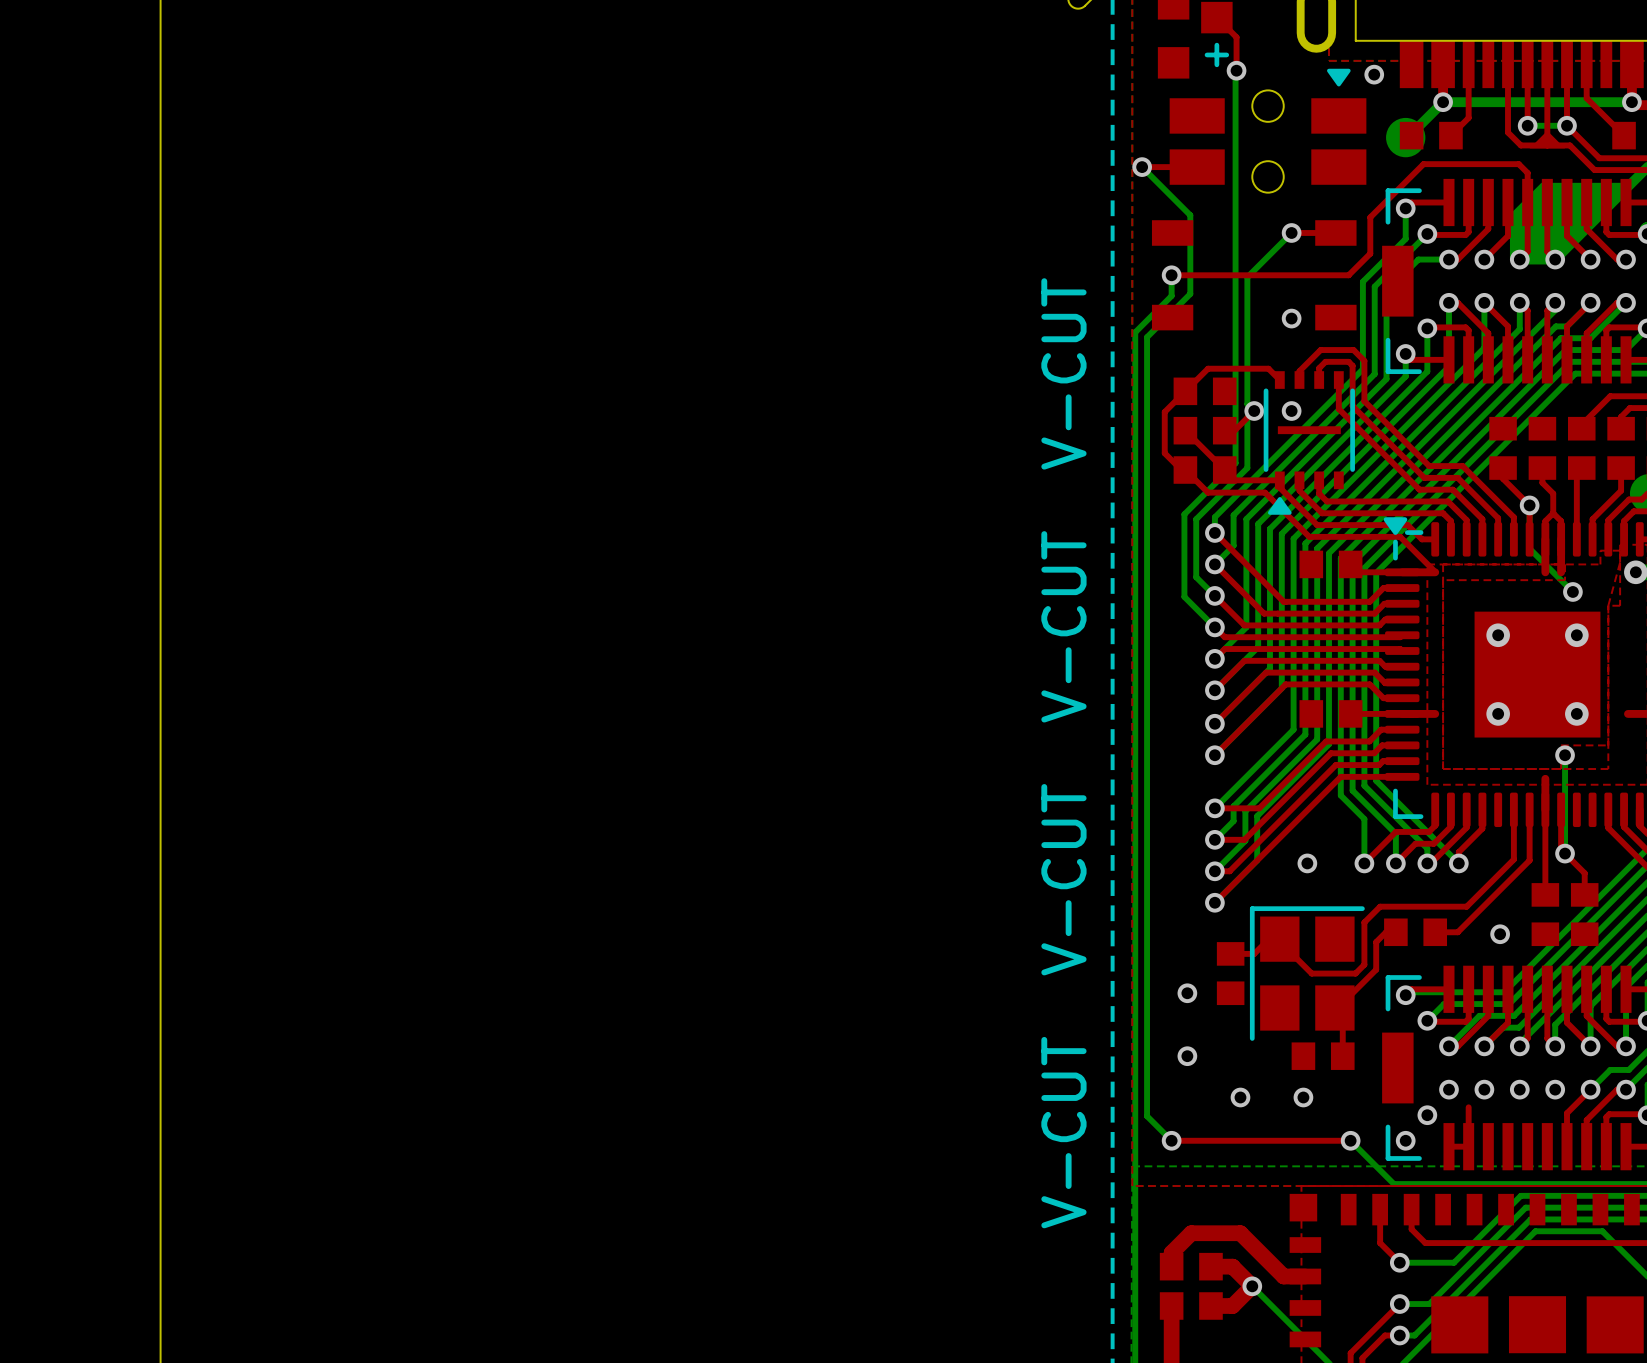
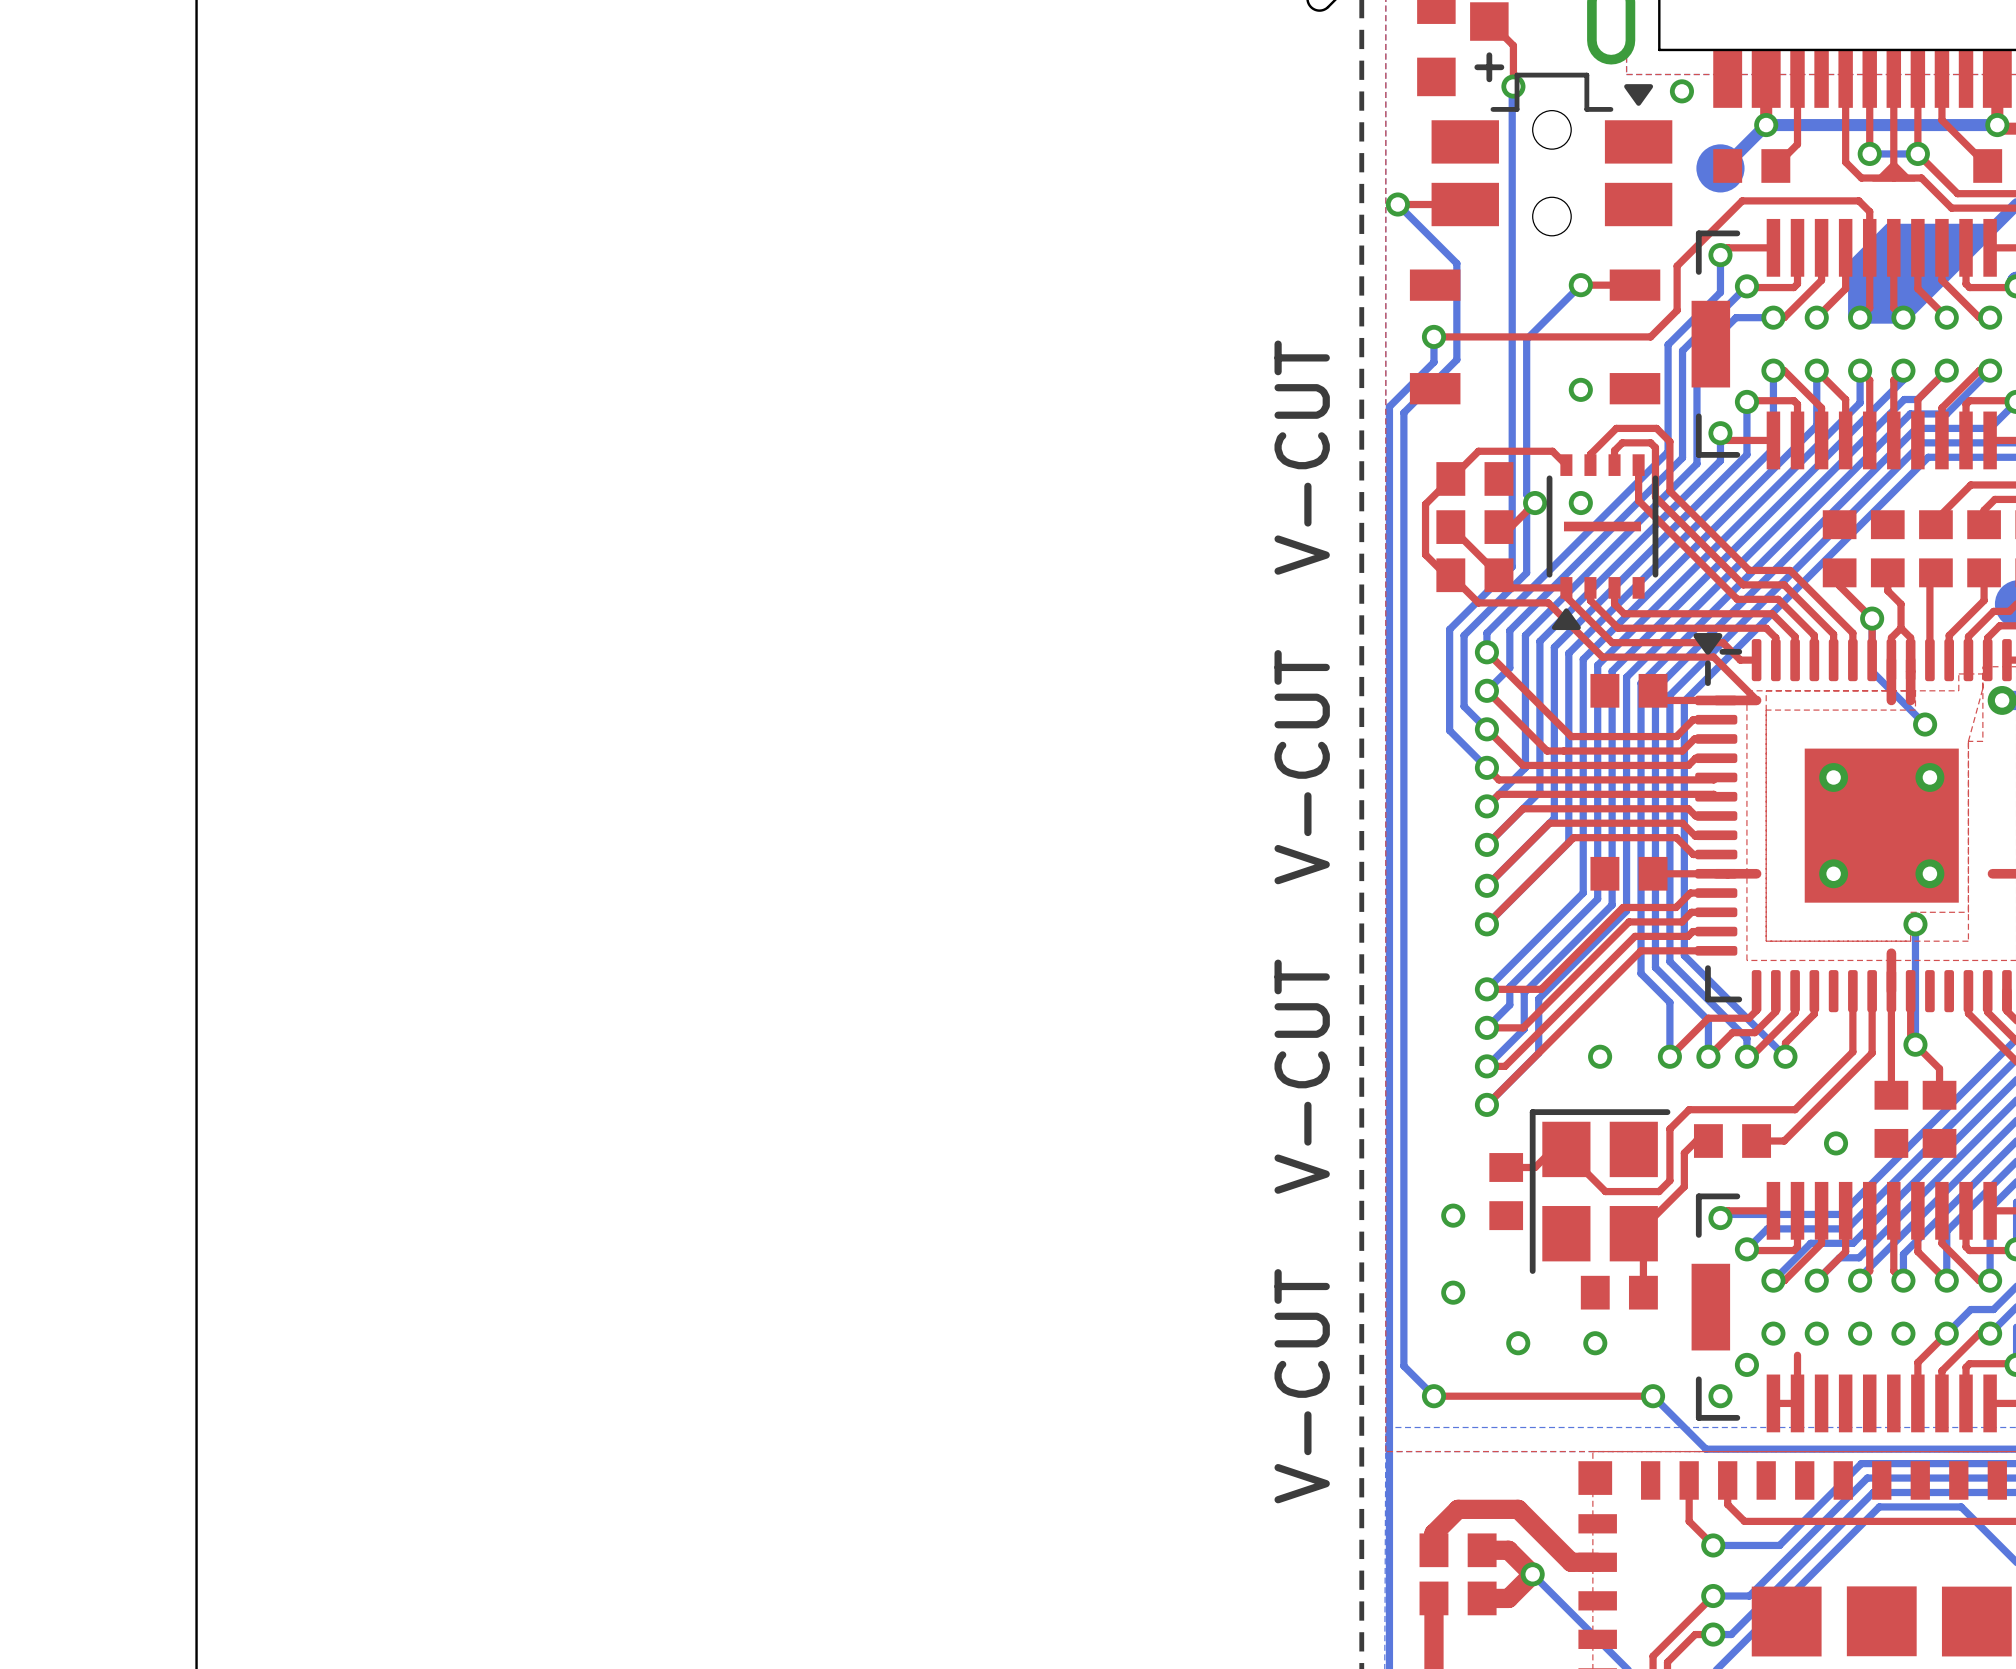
line: none -> (1492, 109) (1517, 109) (1517, 75) (1586, 75) (1586, 109) (1610, 109)

